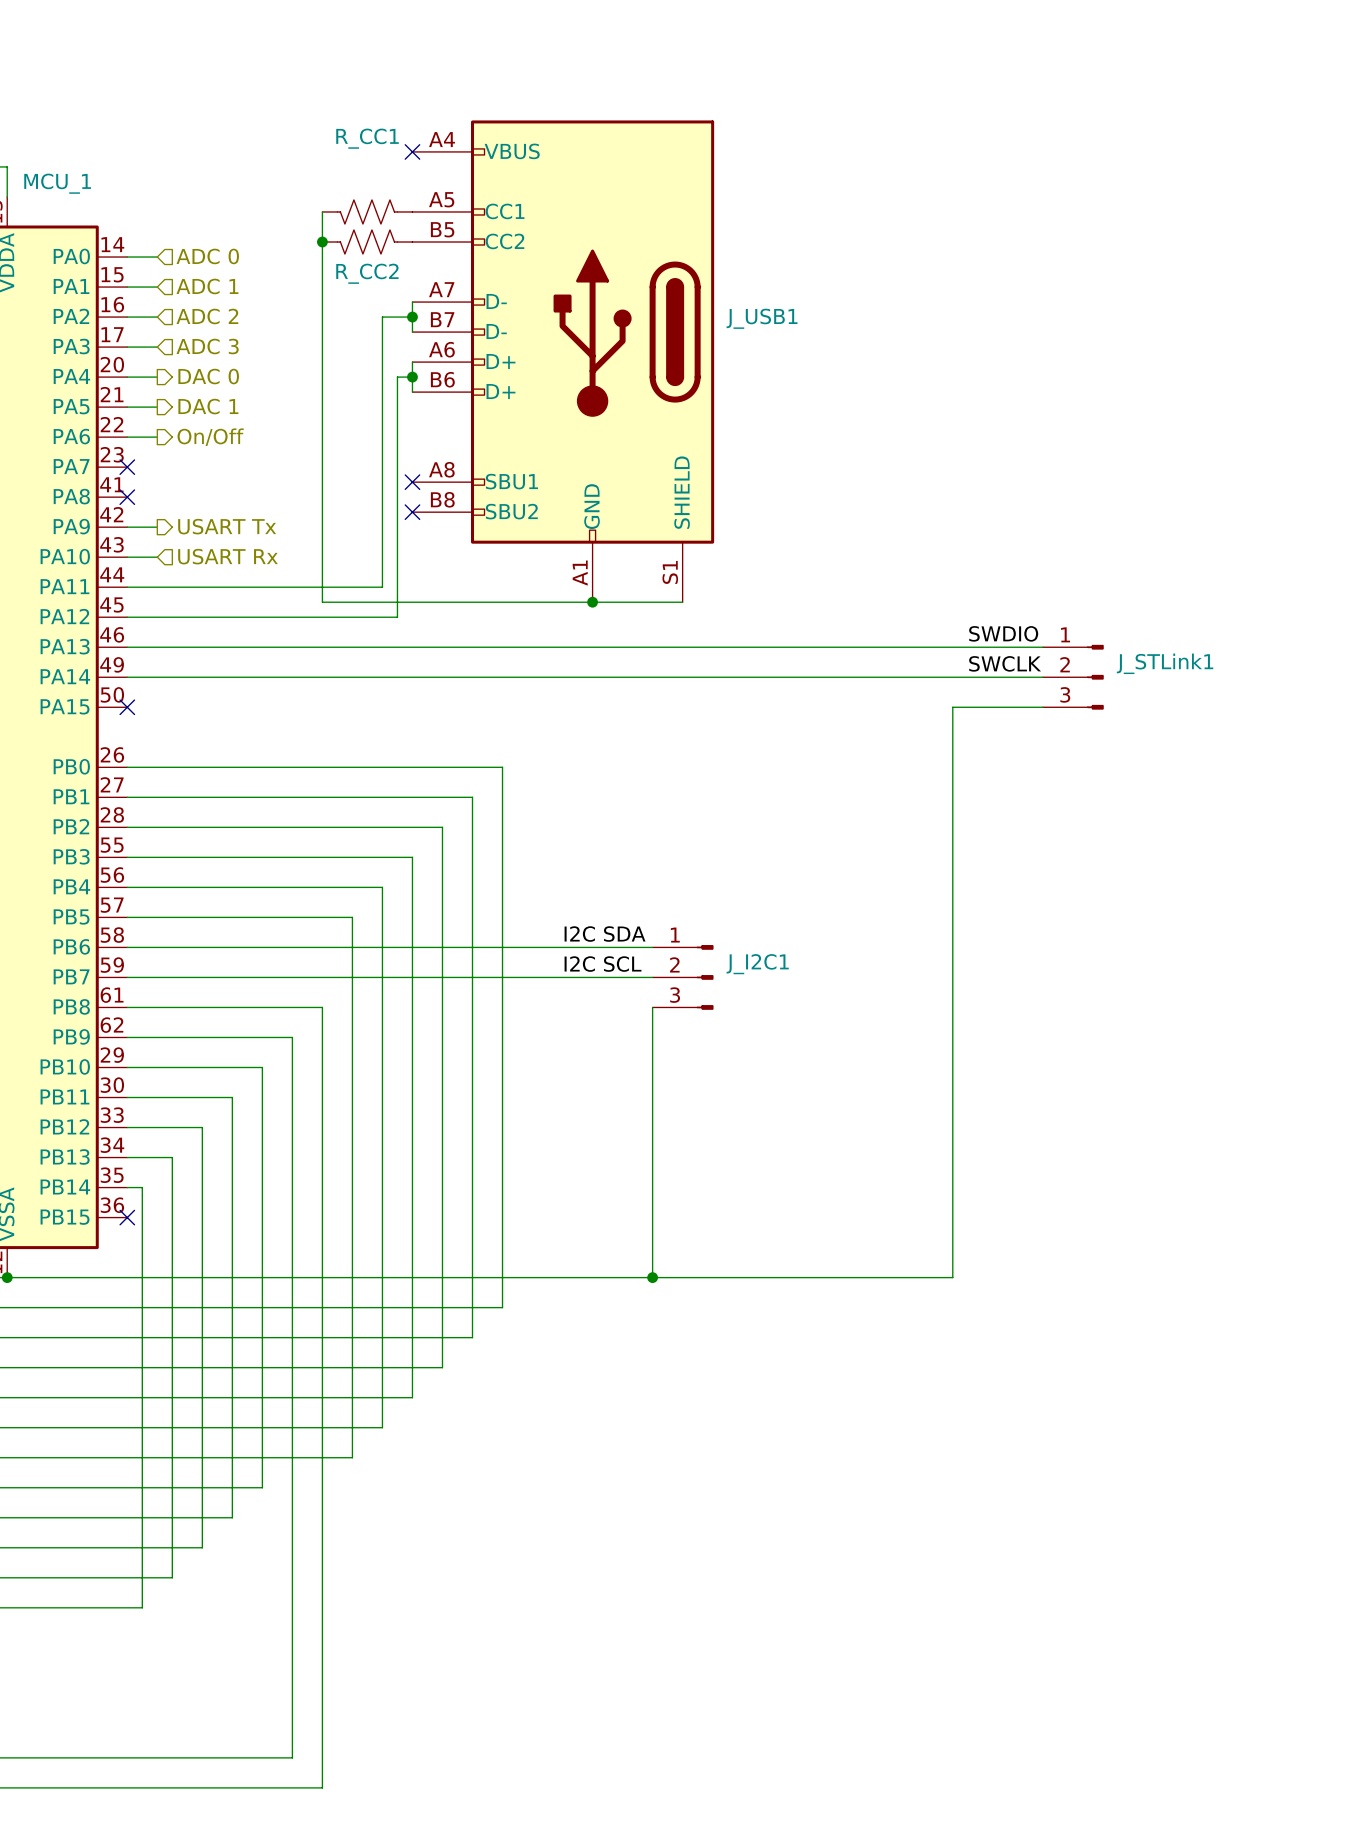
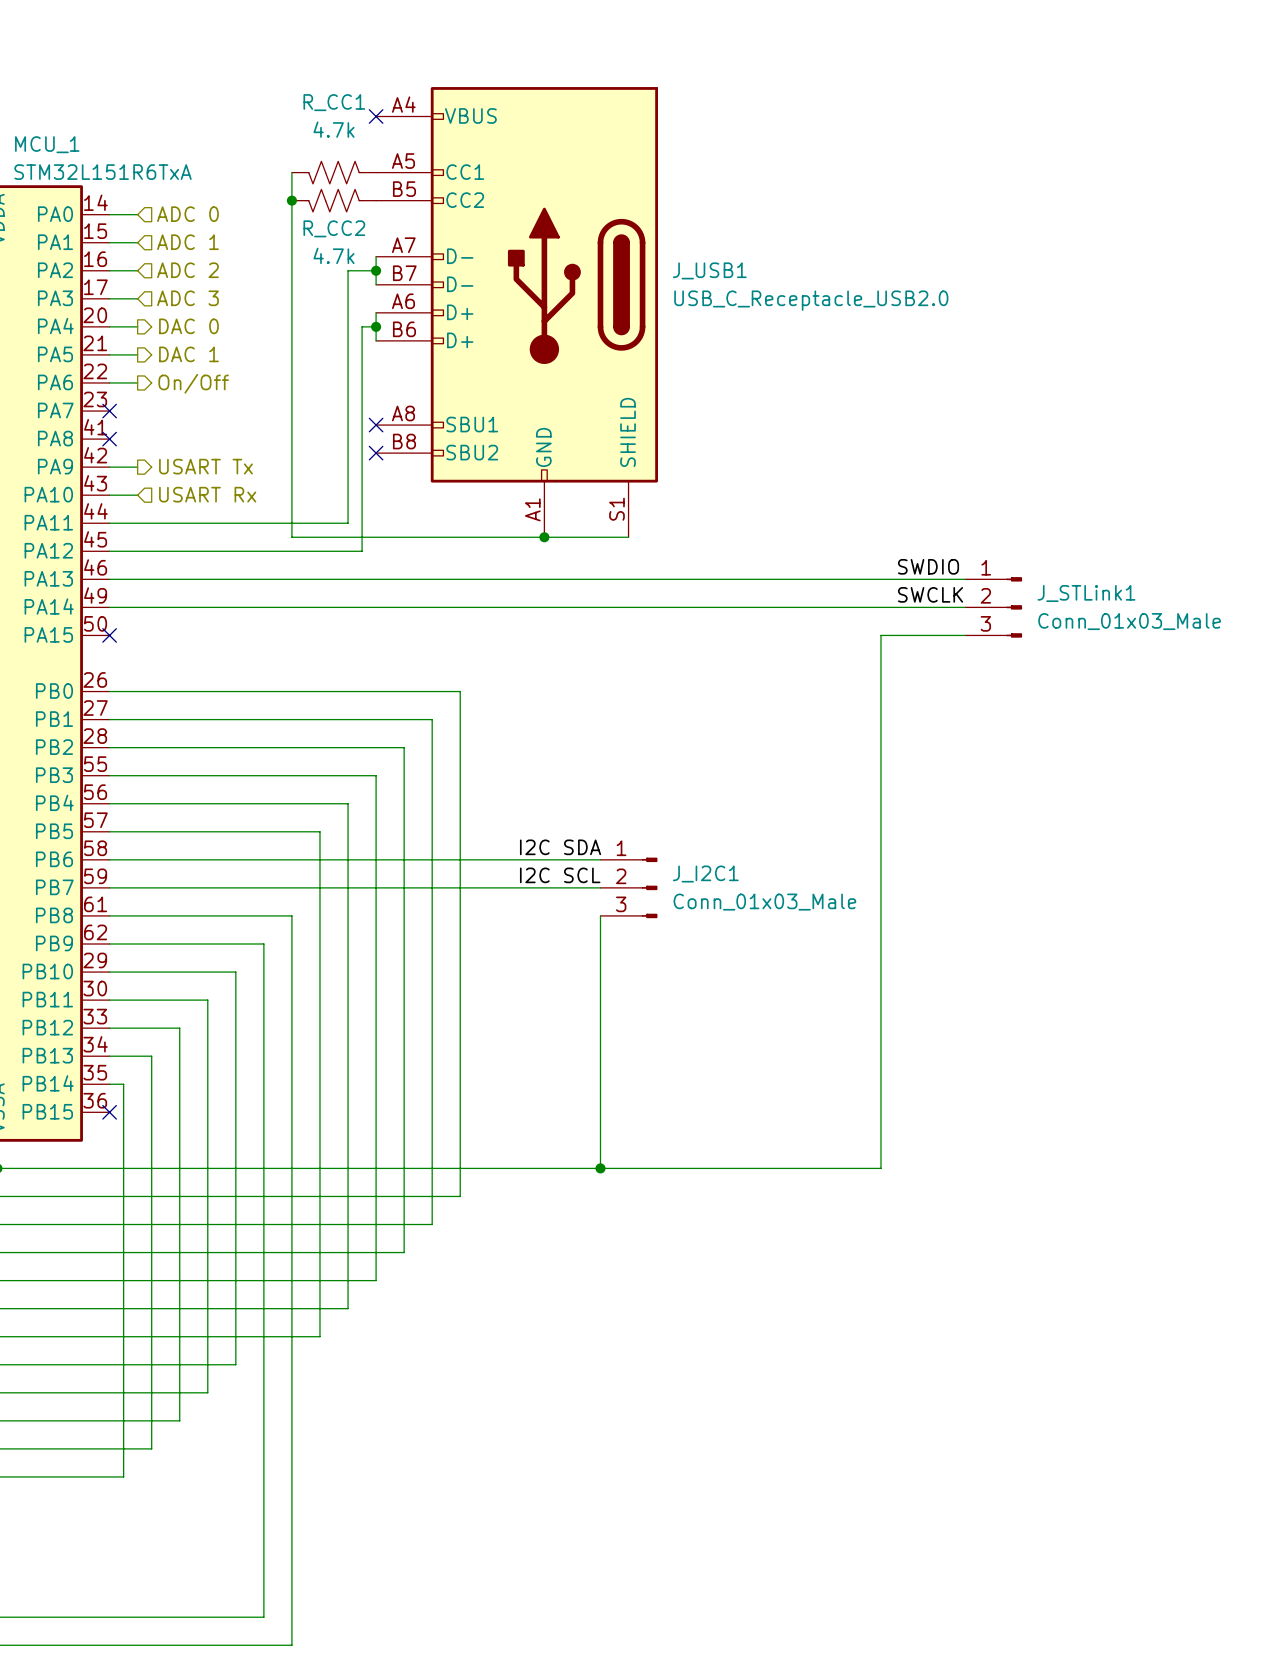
R_CC1 value: none -> 4.7k (334, 129)
MCU_1 value: none -> STM32L151R6TxA (103, 172)
R_CC2 value: none -> 4.7k (334, 255)
J_USB1 value: none -> USB_C_Receptacle_USB2.0 (811, 300)
J_STLink1 value: none -> Conn_01x03_Male (1129, 621)
J_I2C1 value: none -> Conn_01x03_Male (764, 902)

